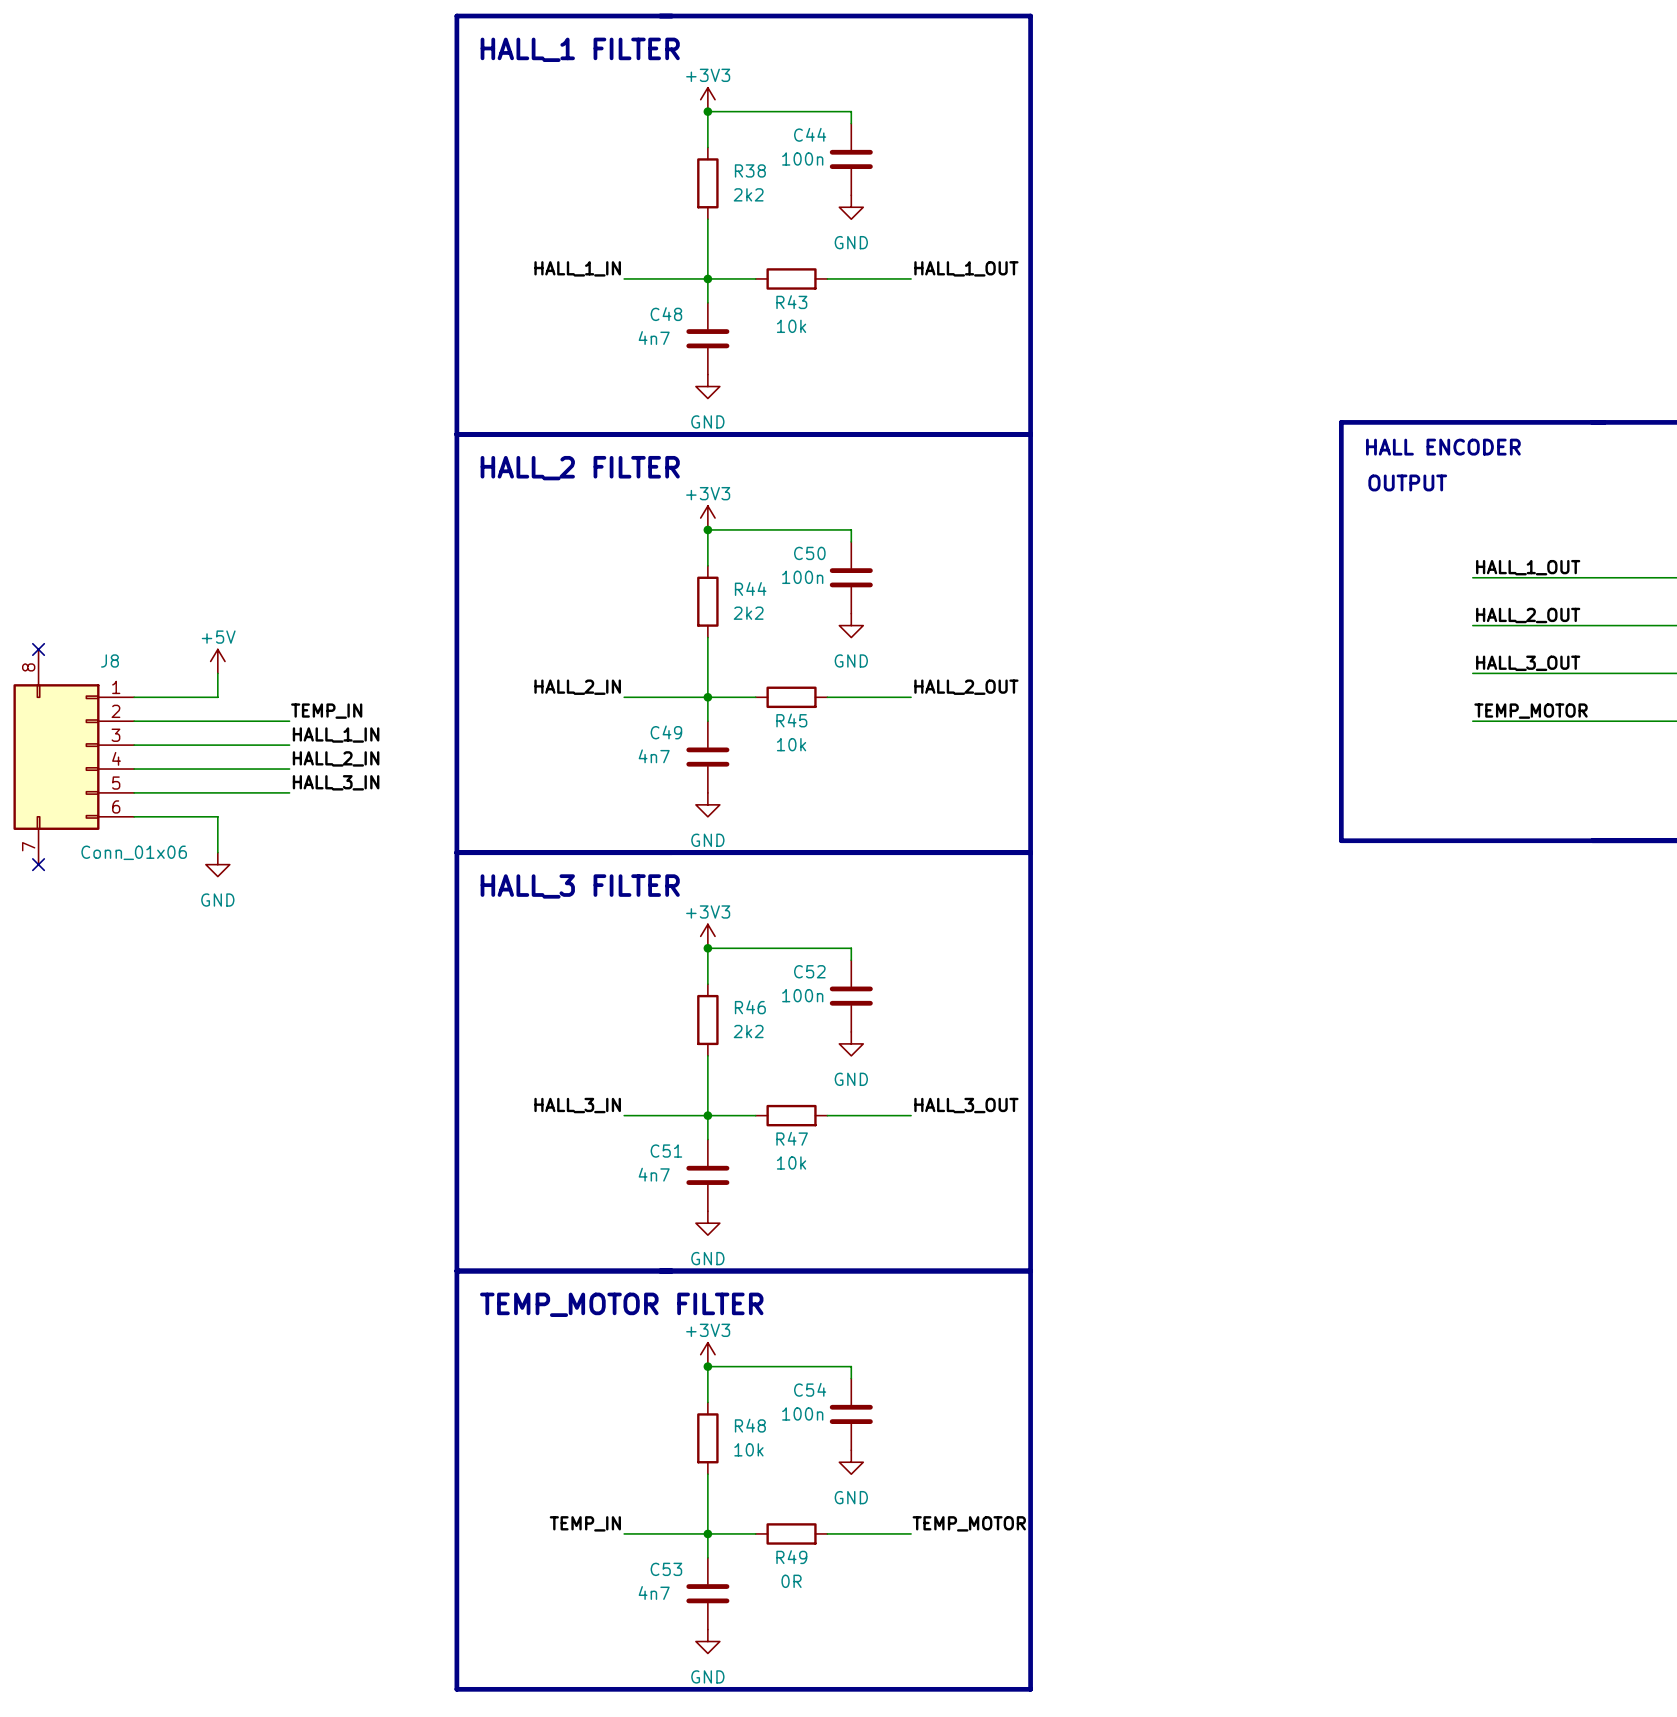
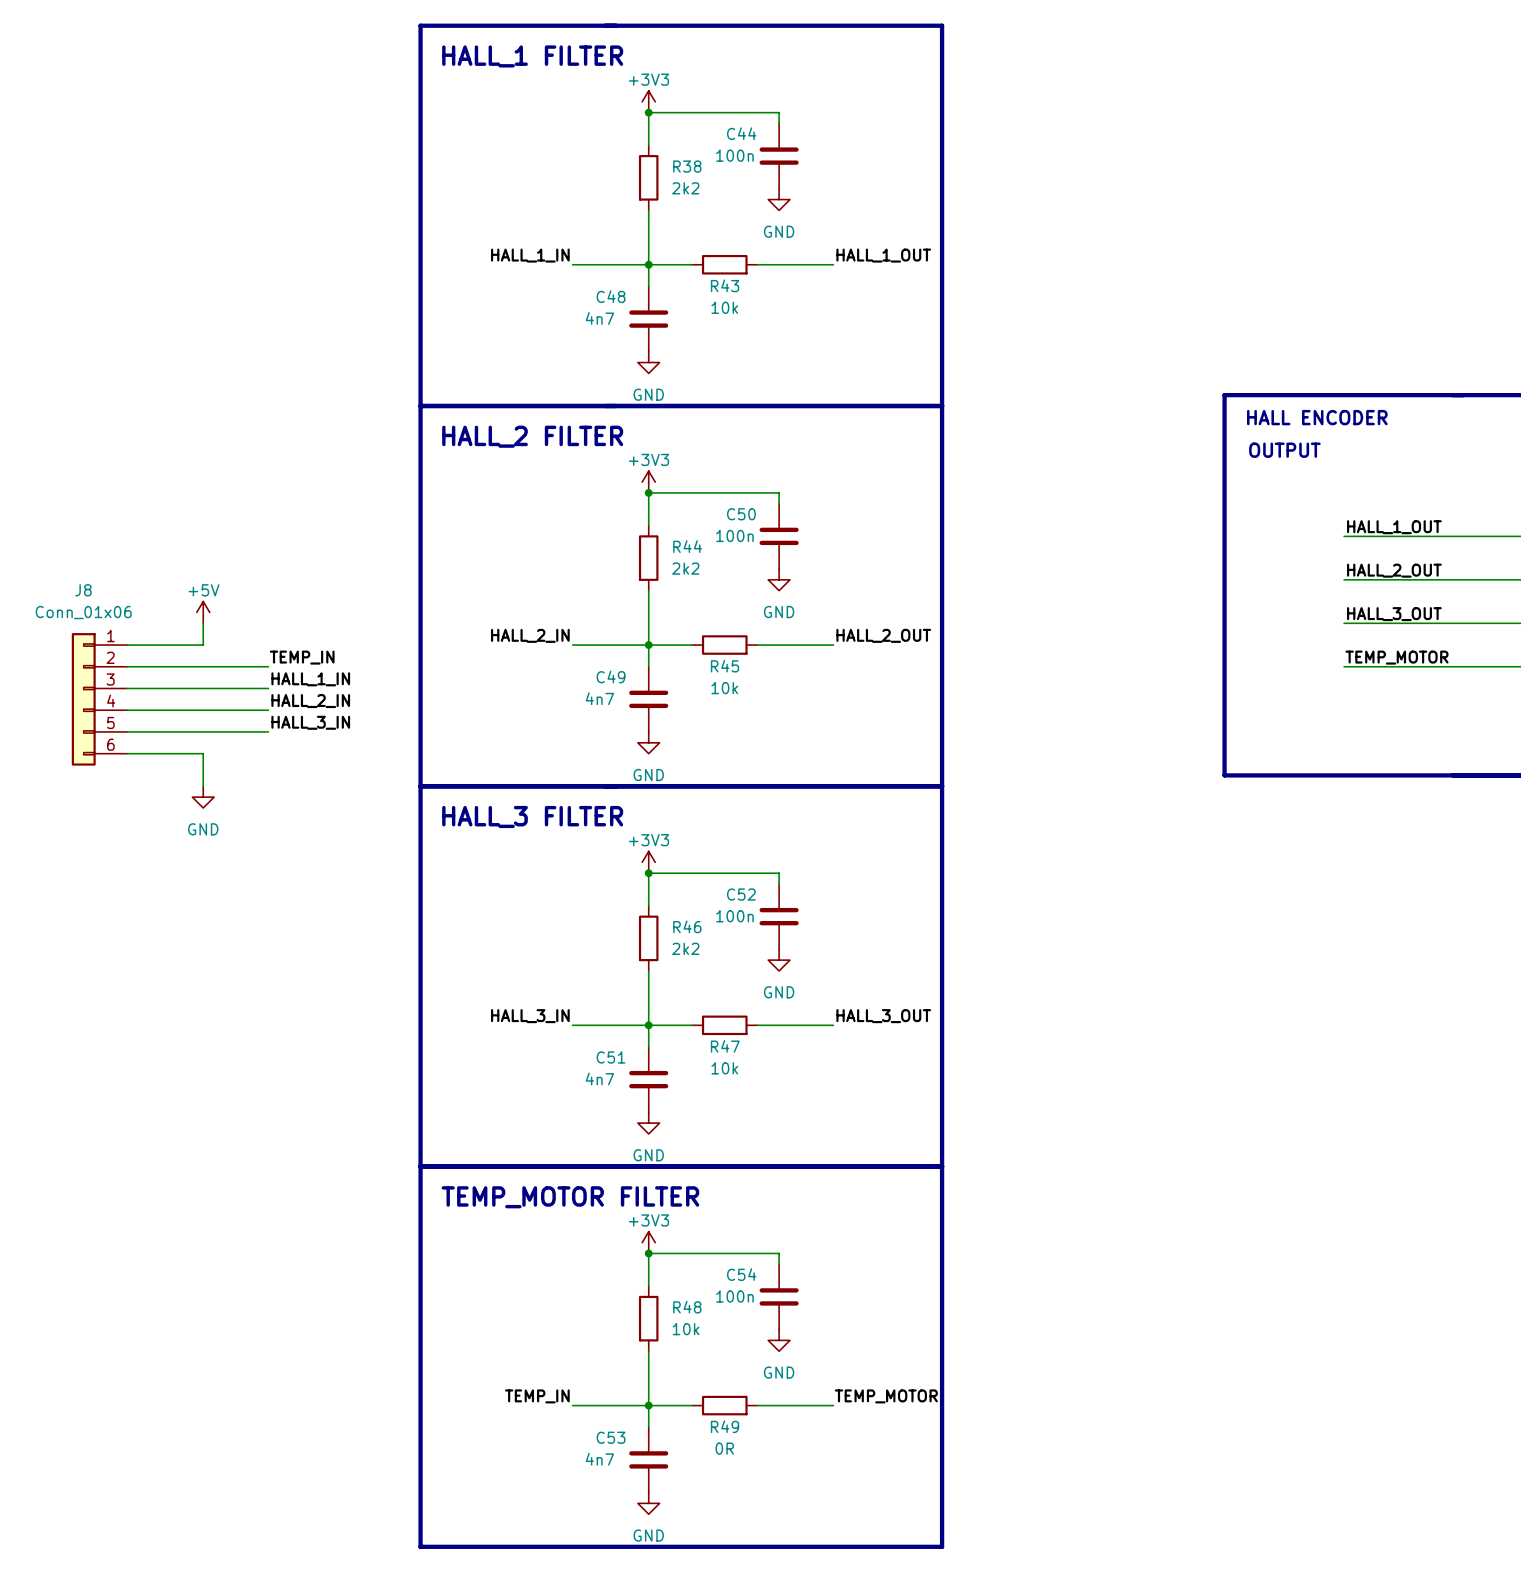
J8 symbol: [13, 649, 135, 865] -> [71, 633, 128, 766]
no-connect mark: (38, 649) -> none
J8 name position: J8 (109, 660) -> J8 (83, 590)
J8 value position: Conn_01x06 (134, 852) -> Conn_01x06 (83, 612)
no-connect mark: (38, 864) -> none

